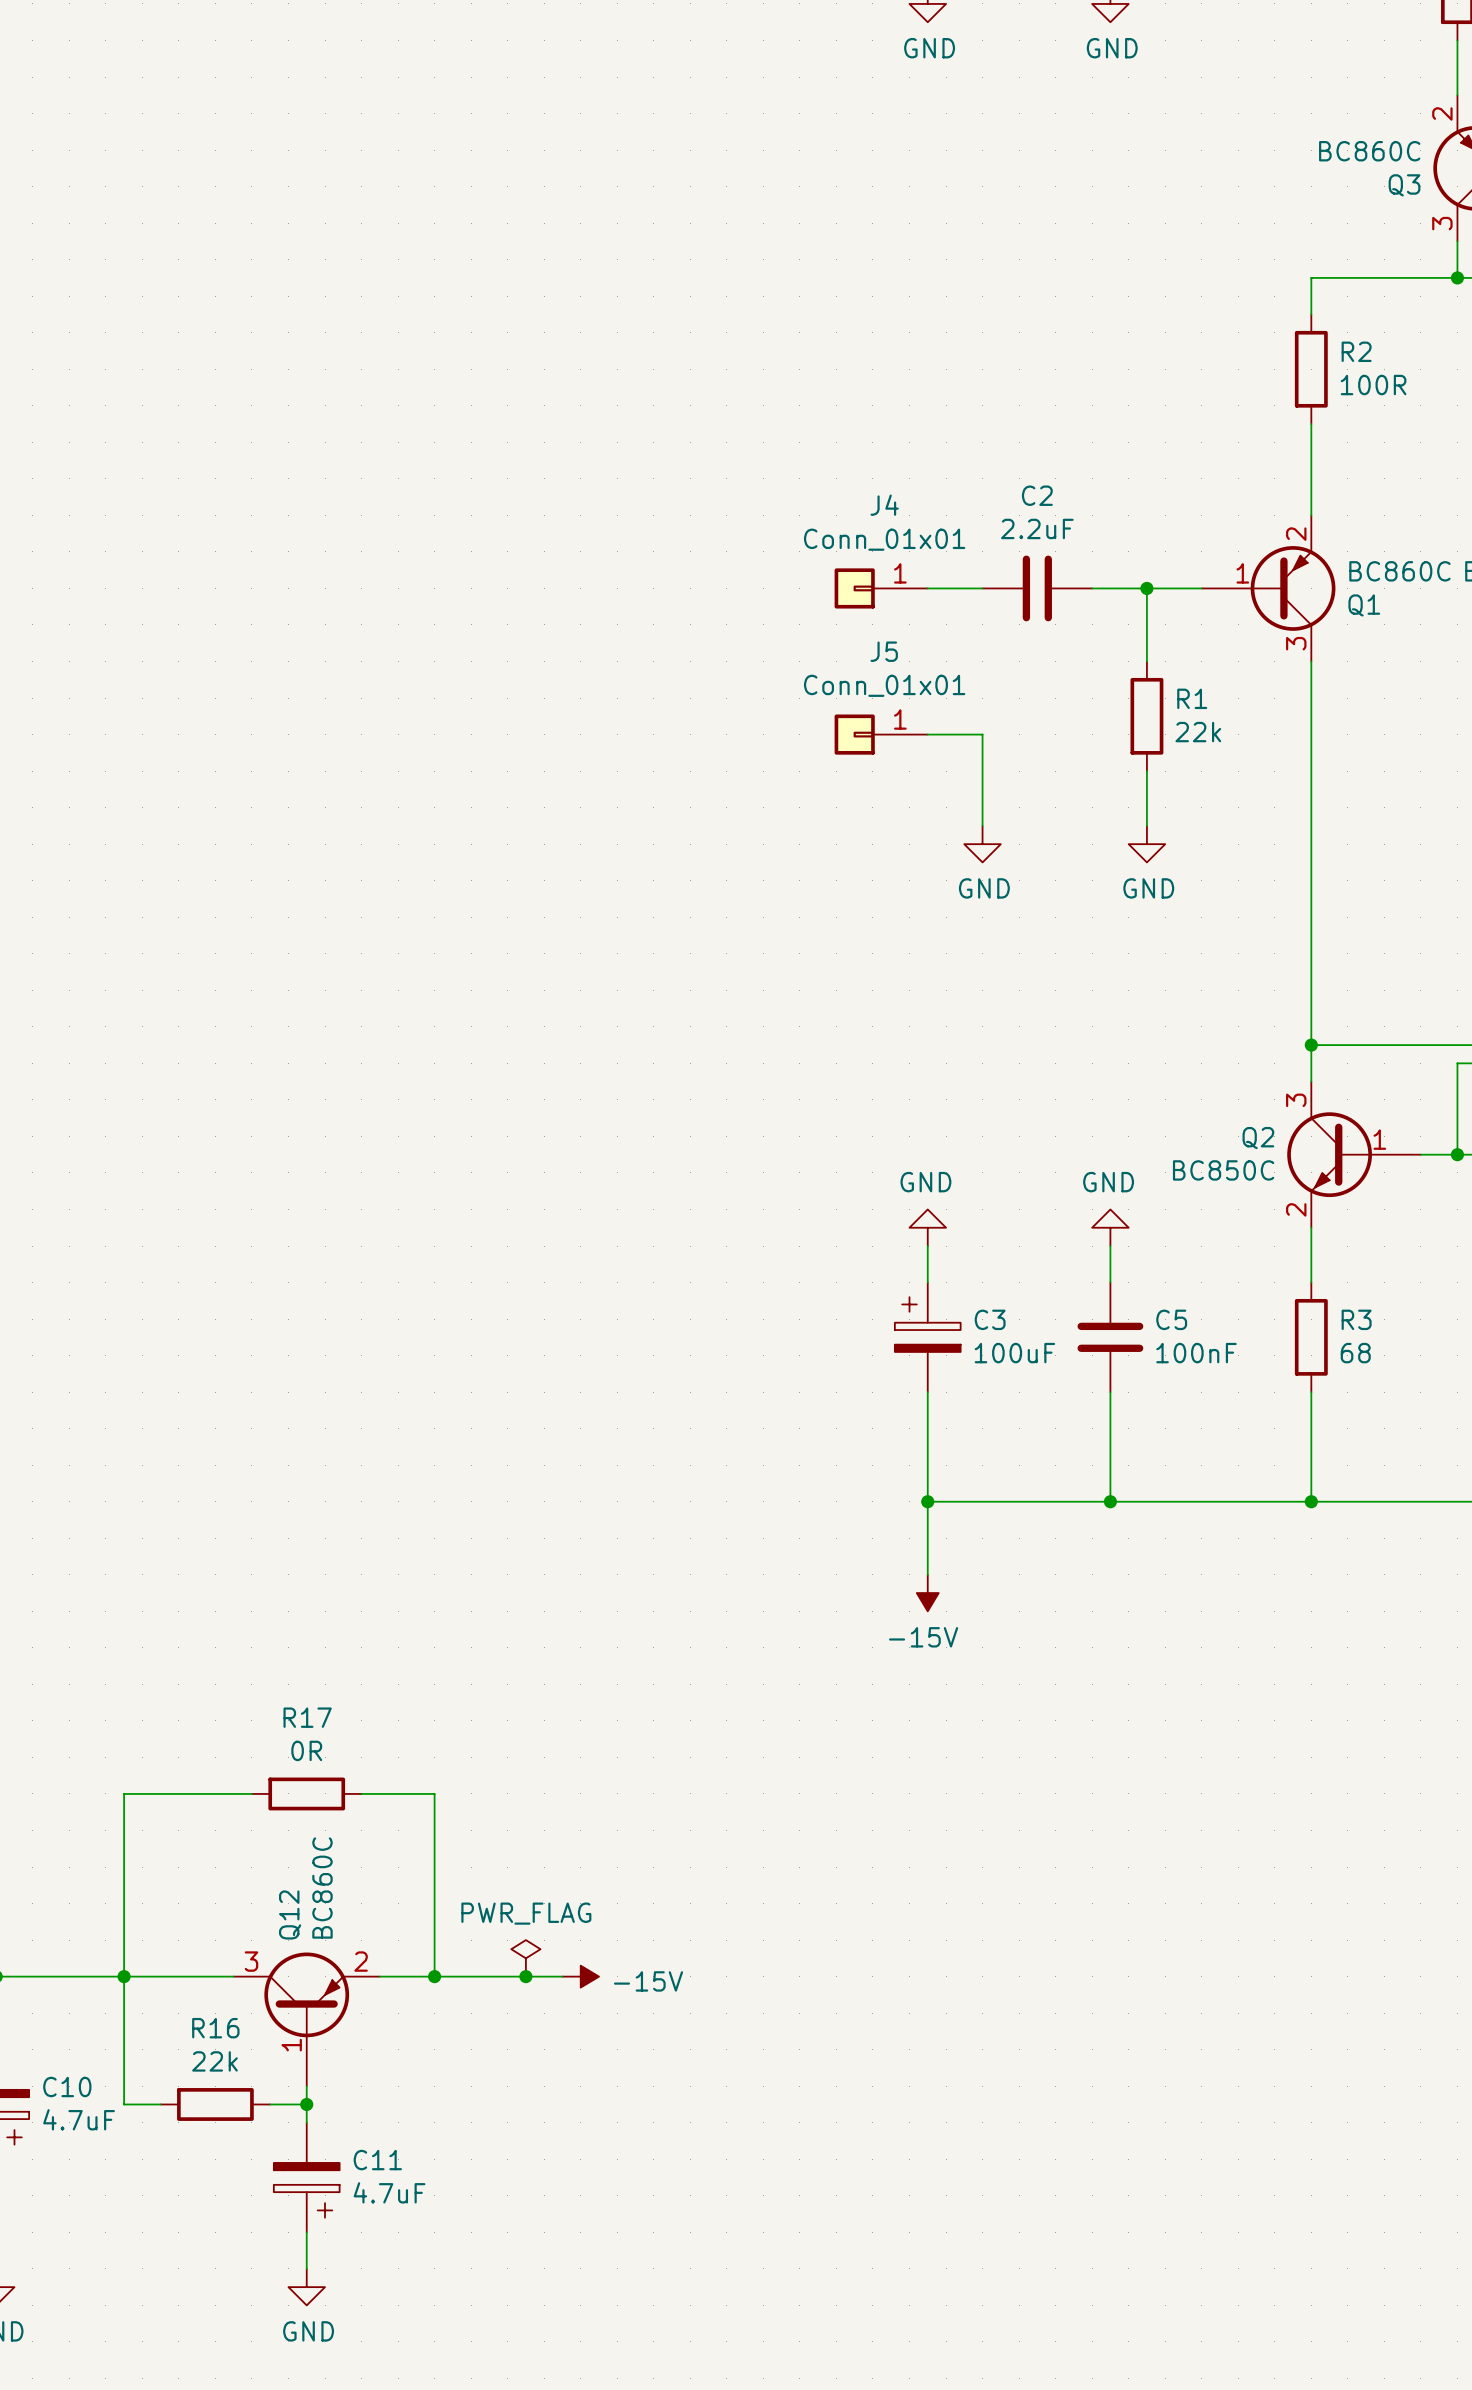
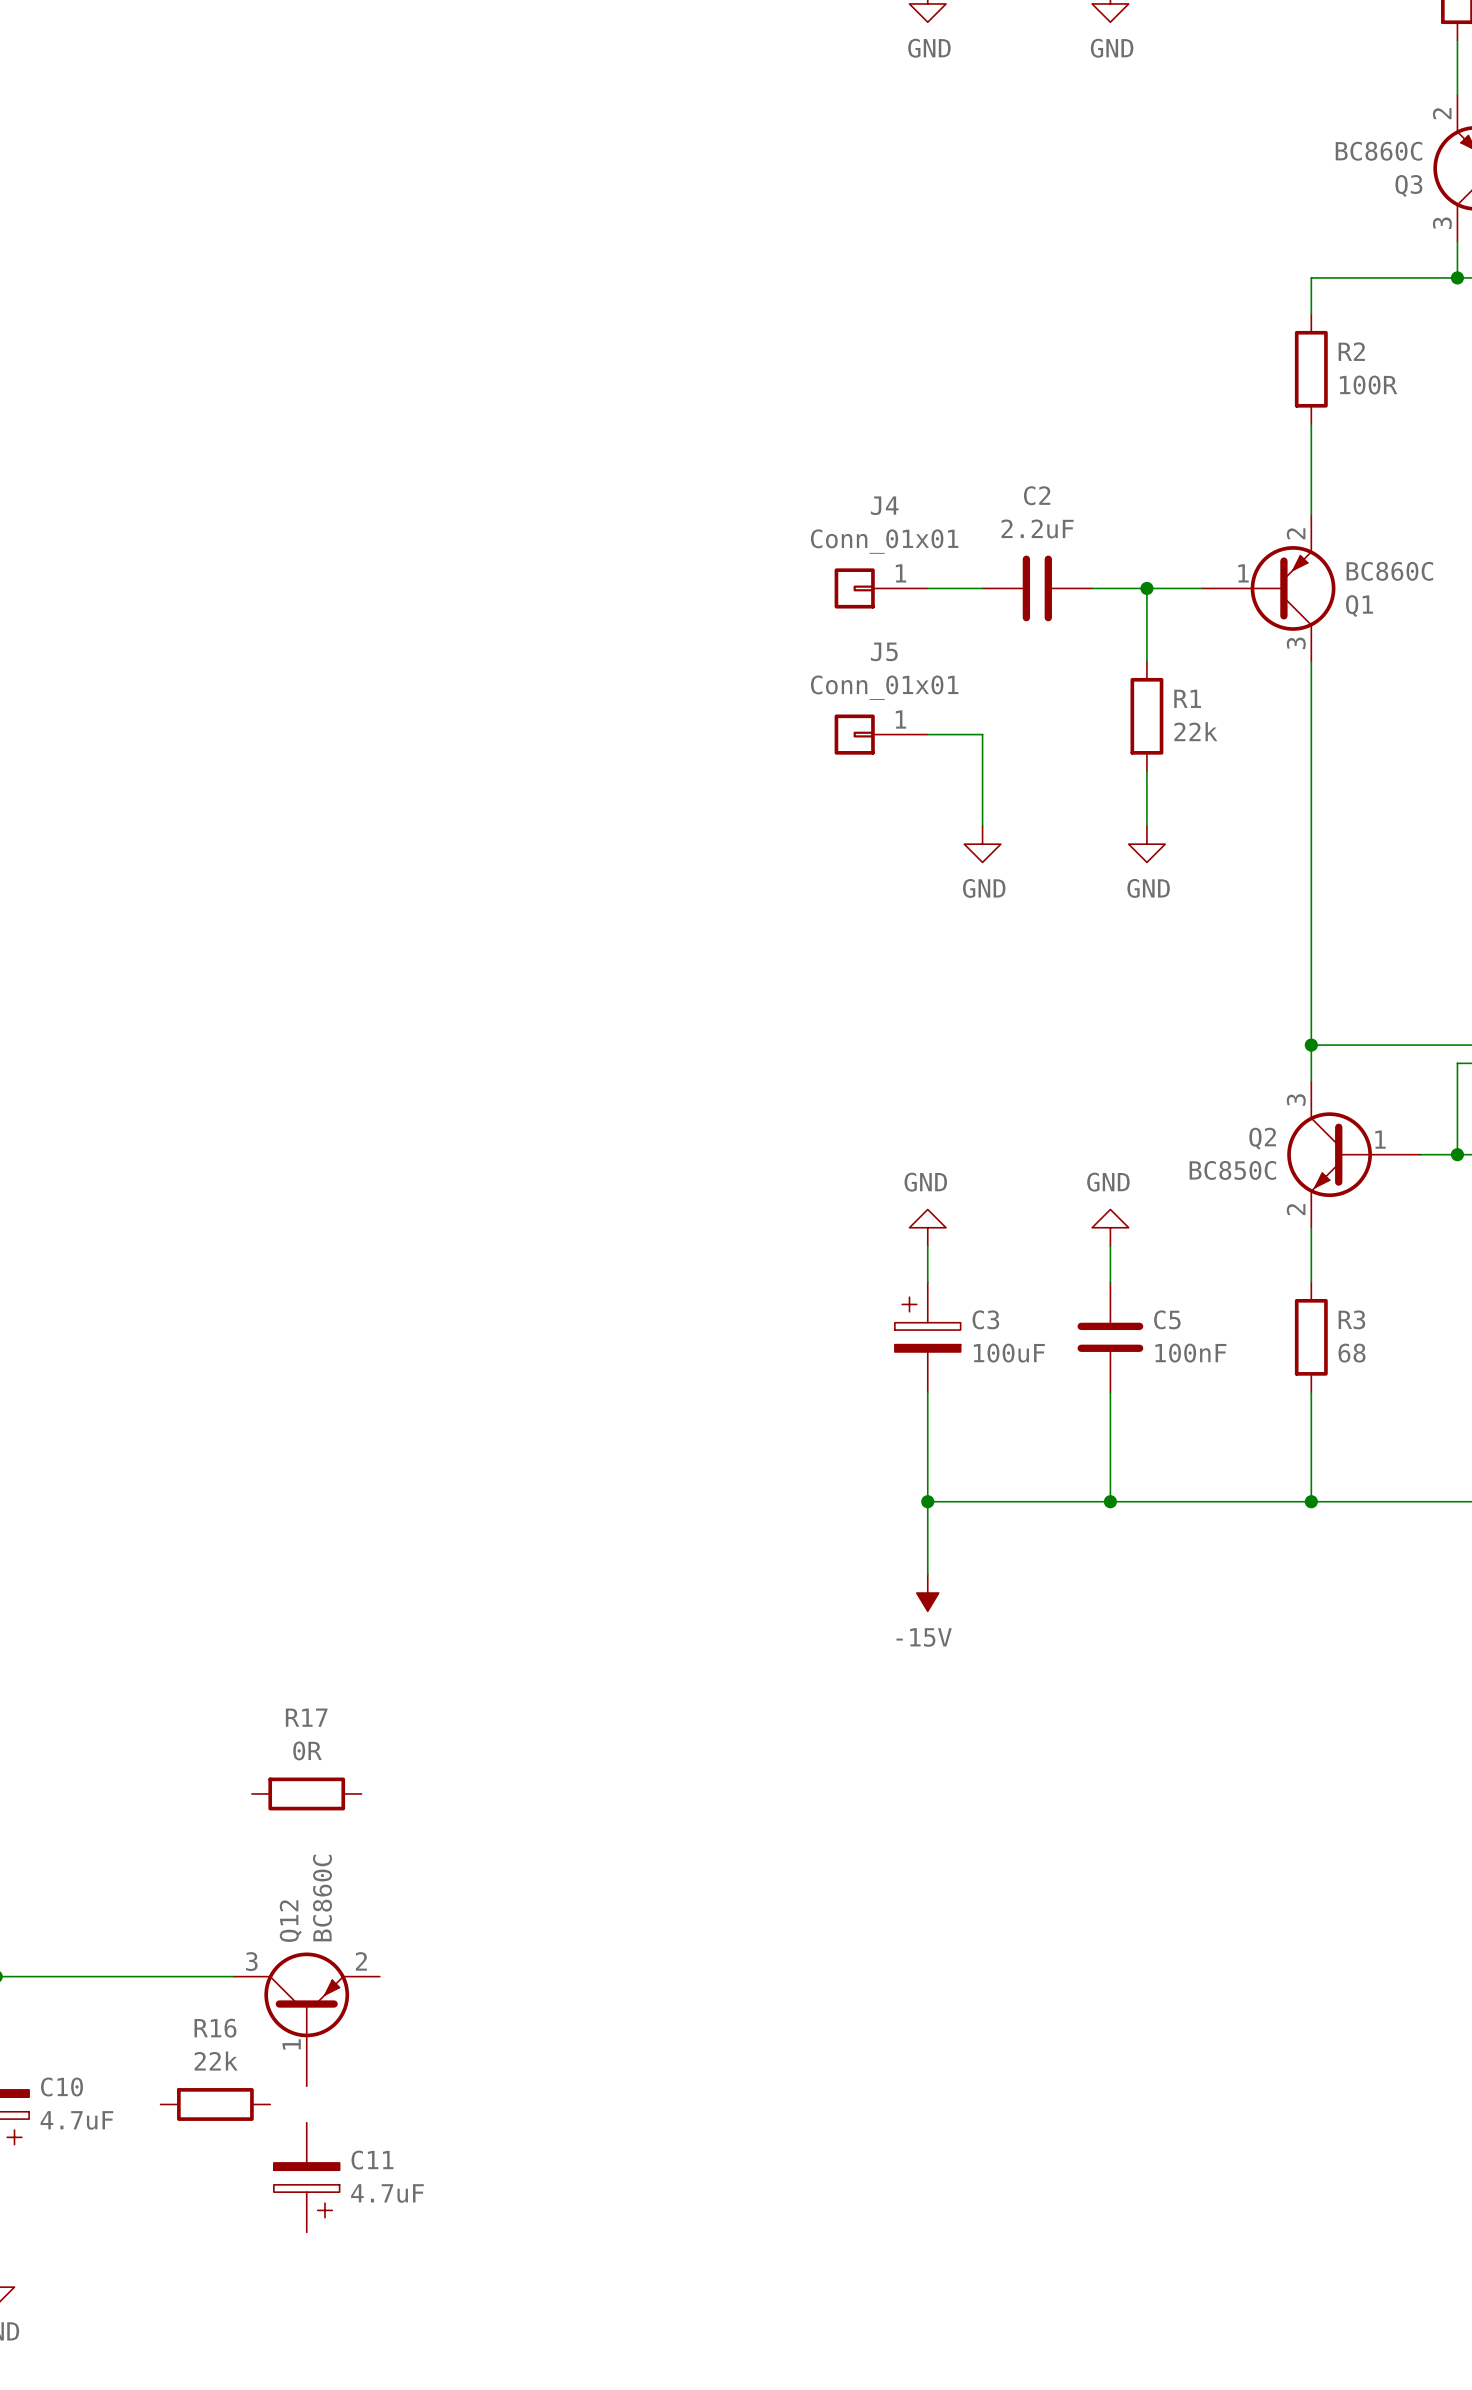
wire: (251, 1793) (124, 1793) (124, 2104) (160, 2104) -> none
wire: (361, 1793) (434, 1793) (434, 1976) -> none
power symbol: PWR_FLAG (525, 1958) -> none
junction: (124, 1976) -> none
wire: (379, 1976) (562, 1976) -> none
junction: (434, 1976) -> none
junction: (525, 1976) -> none
power symbol: -15V (580, 1976) -> none
wire: (306, 2086) (306, 2122) -> none
wire: (270, 2104) (306, 2104) -> none
junction: (306, 2104) -> none
wire: (306, 2232) (306, 2268) -> none
power symbol: GND (306, 2287) -> none

